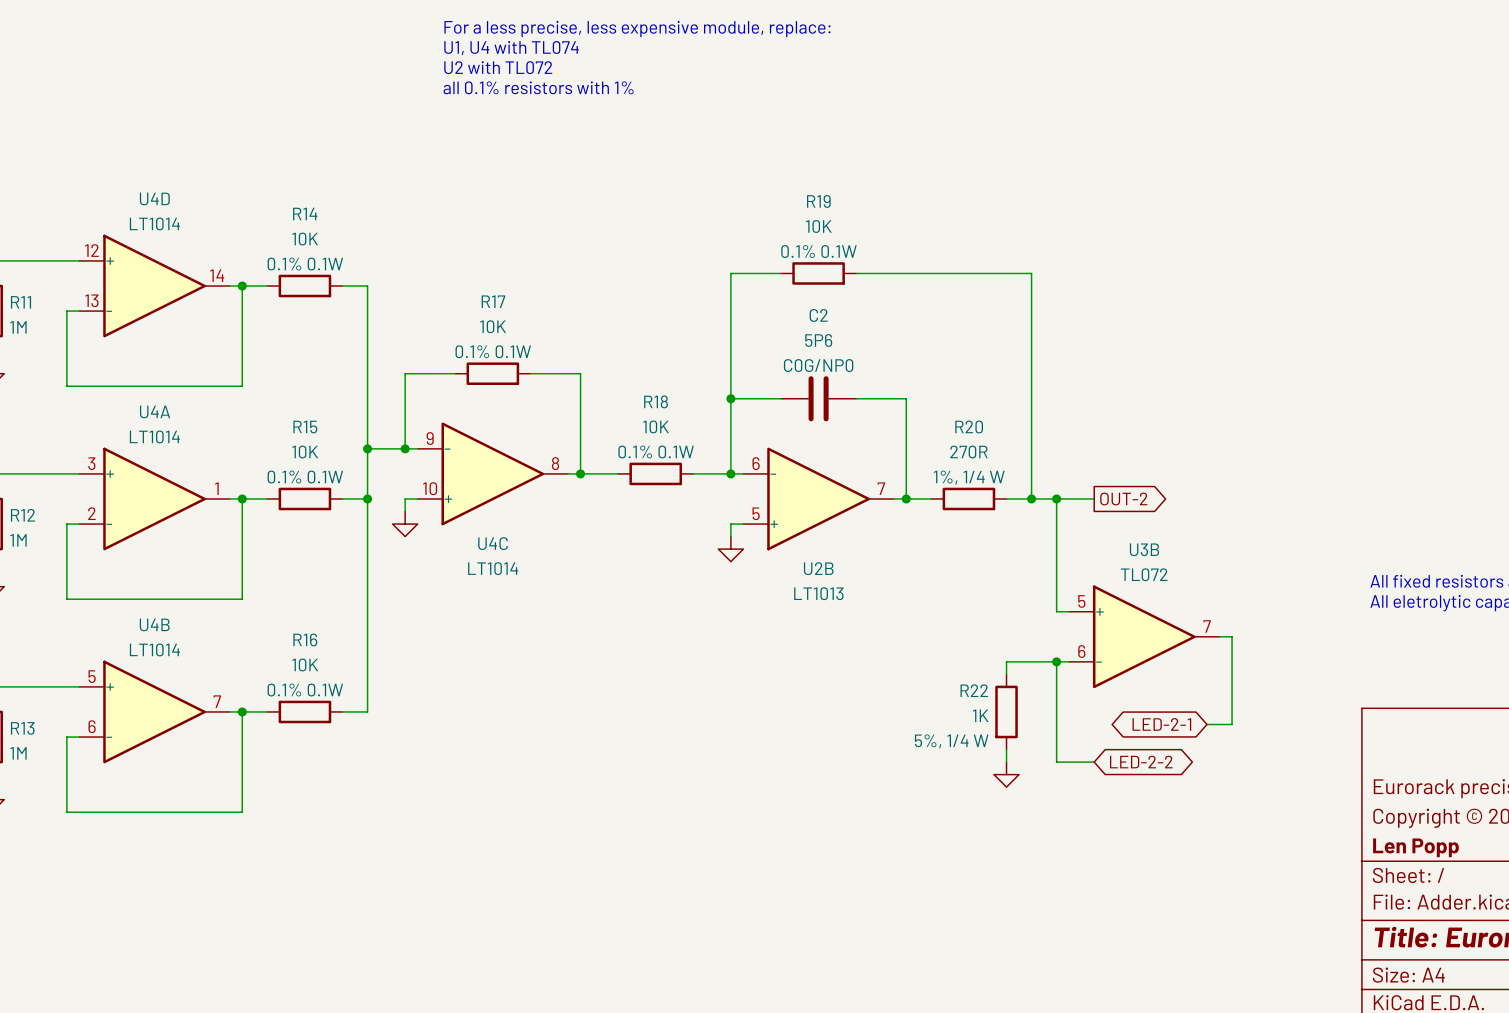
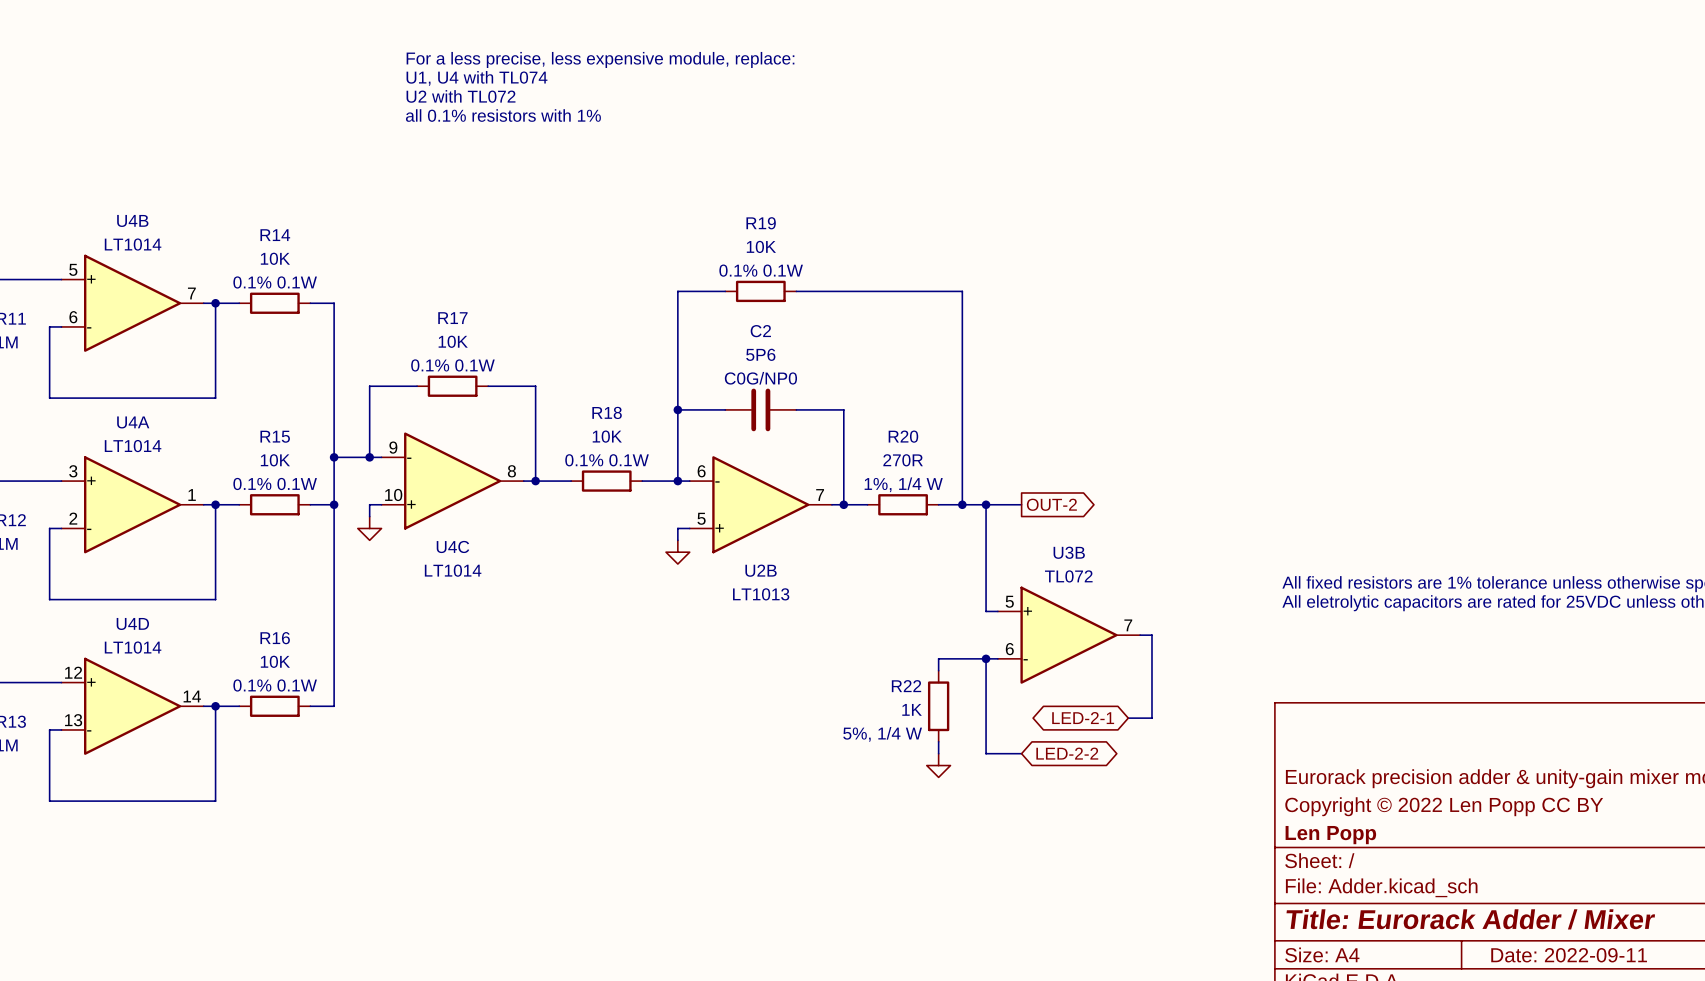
U4D position: (154, 286) -> (132, 706)
U4B position: (154, 711) -> (132, 303)

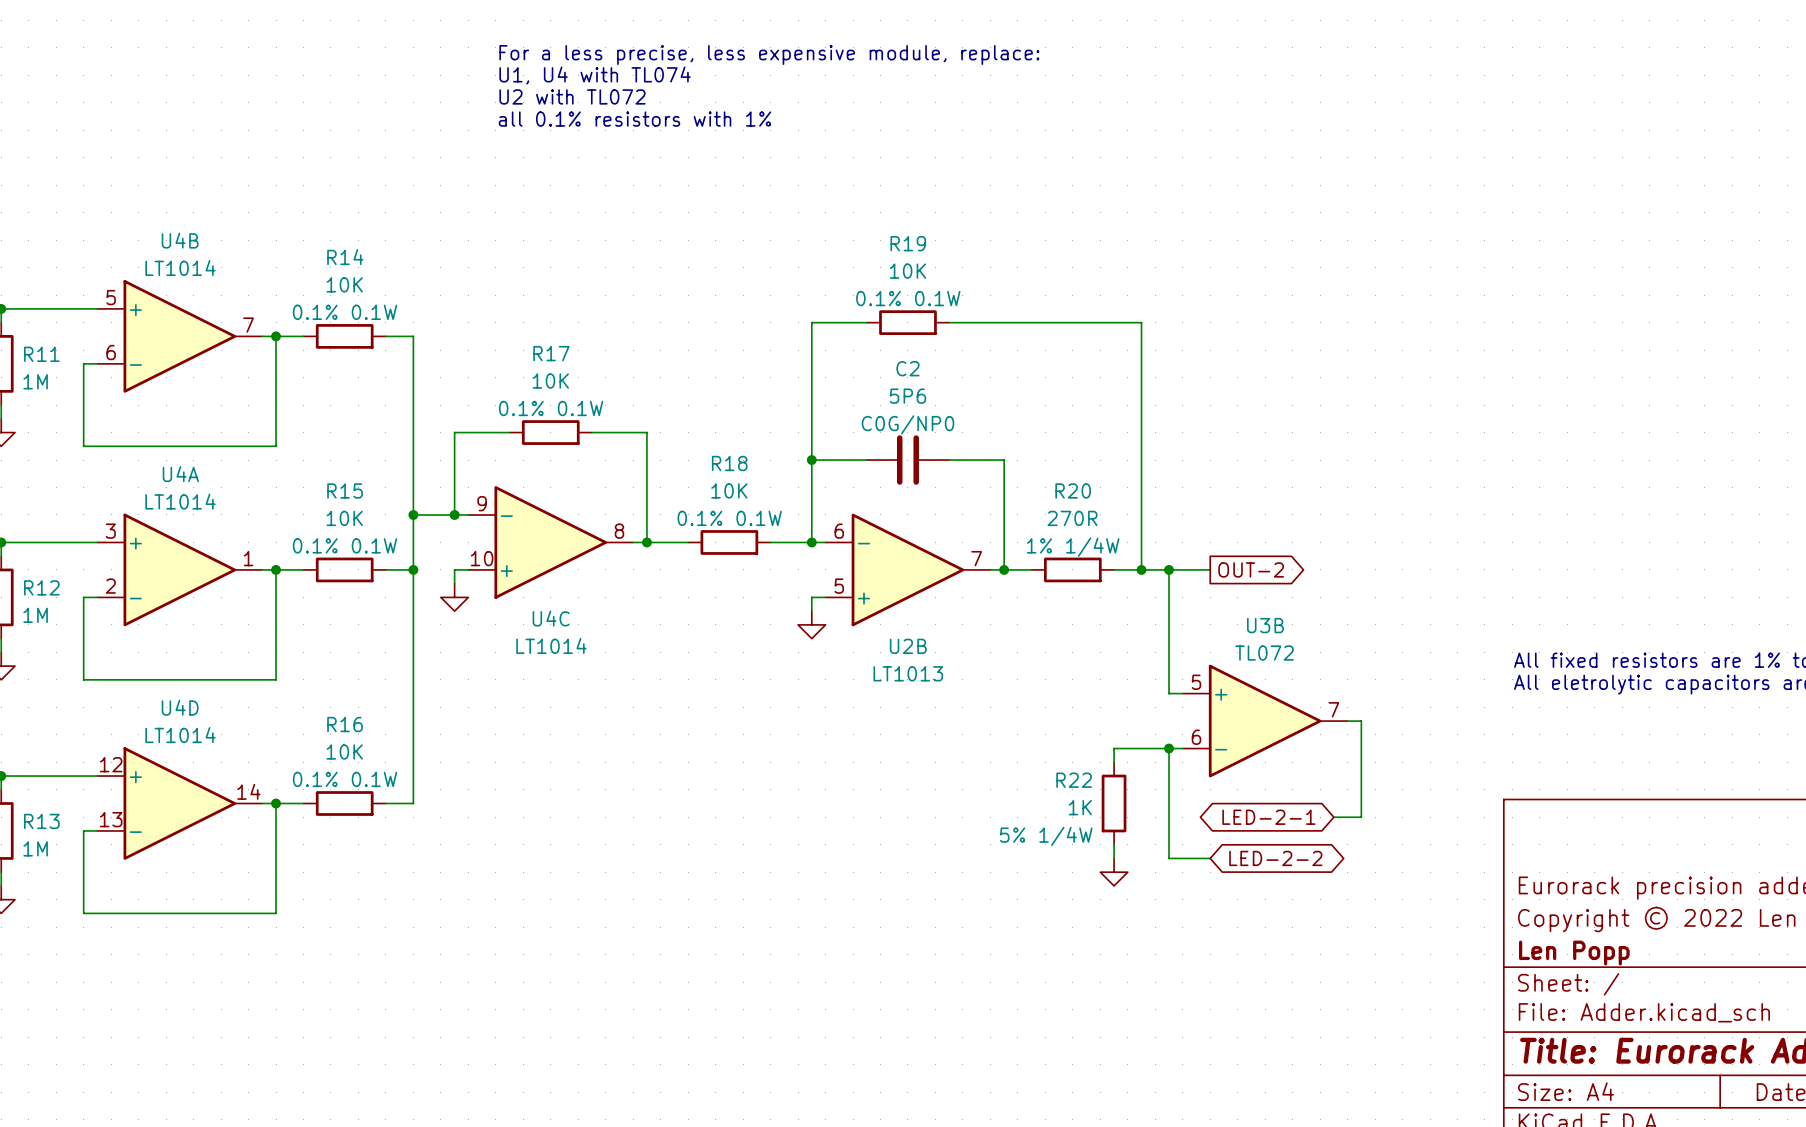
R20 text: 1%, 1/4 W (903, 484) -> 1% 1/4W (1073, 547)
R22 text: 5%, 1/4 W (882, 734) -> 5% 1/4W (1046, 836)

